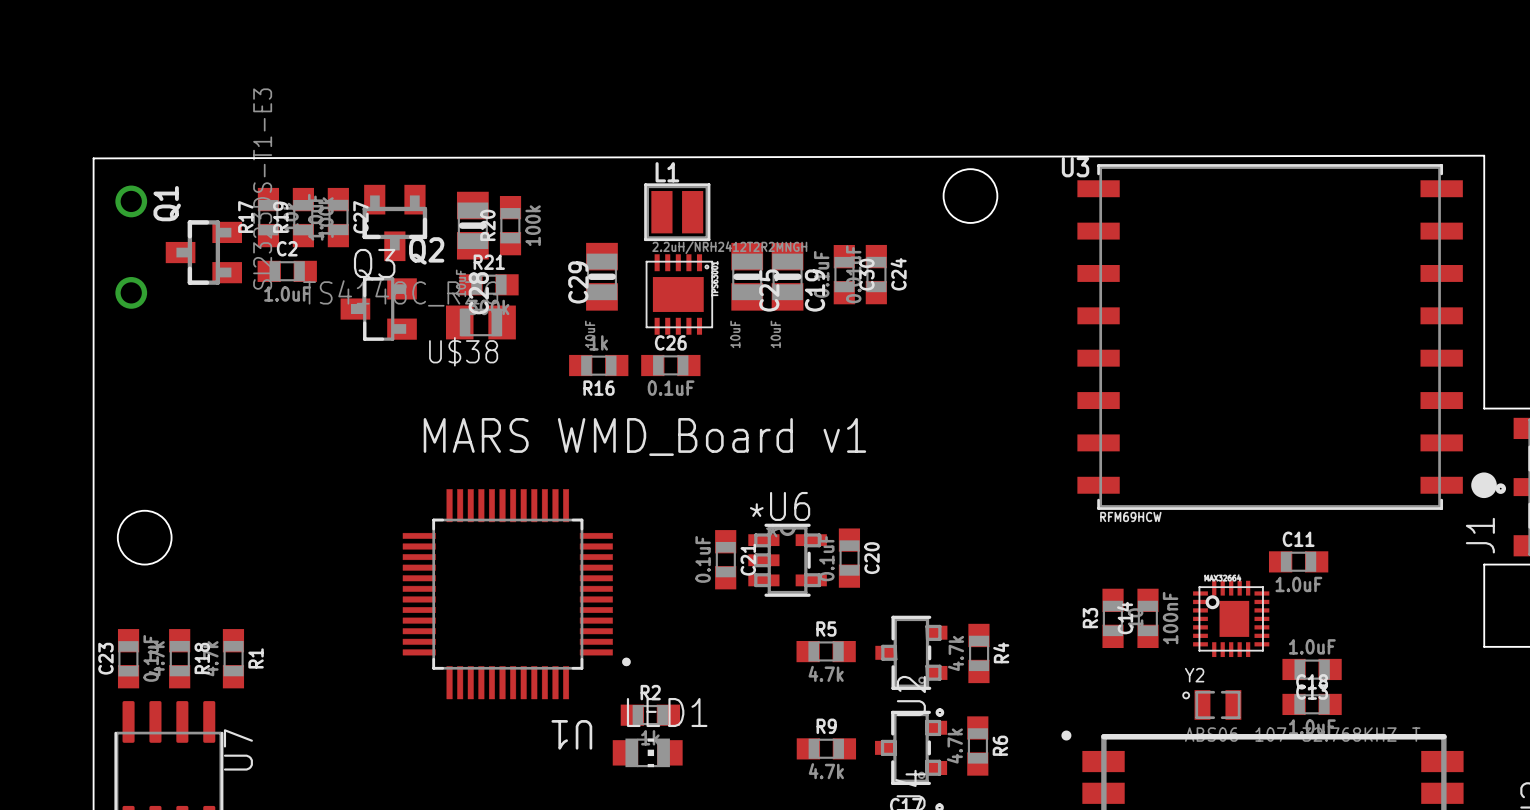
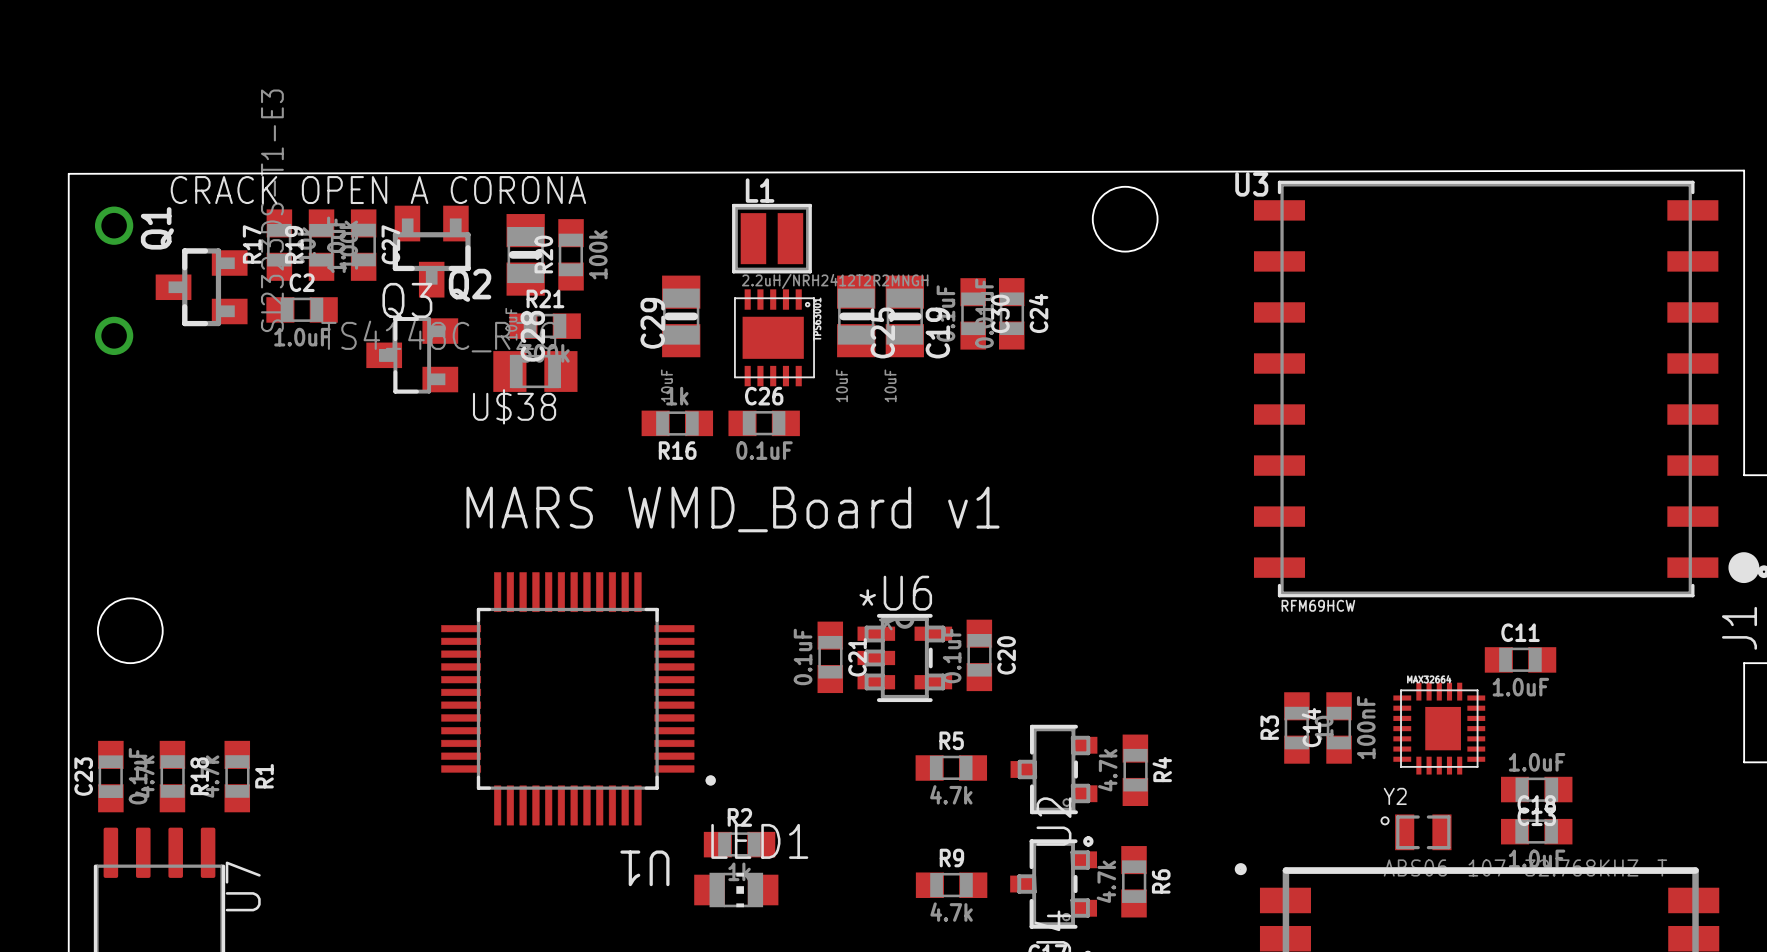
text: none -> CRACK OPEN A CORONA (378, 190)
drawing: [1205, 595, 1220, 610] -> none

